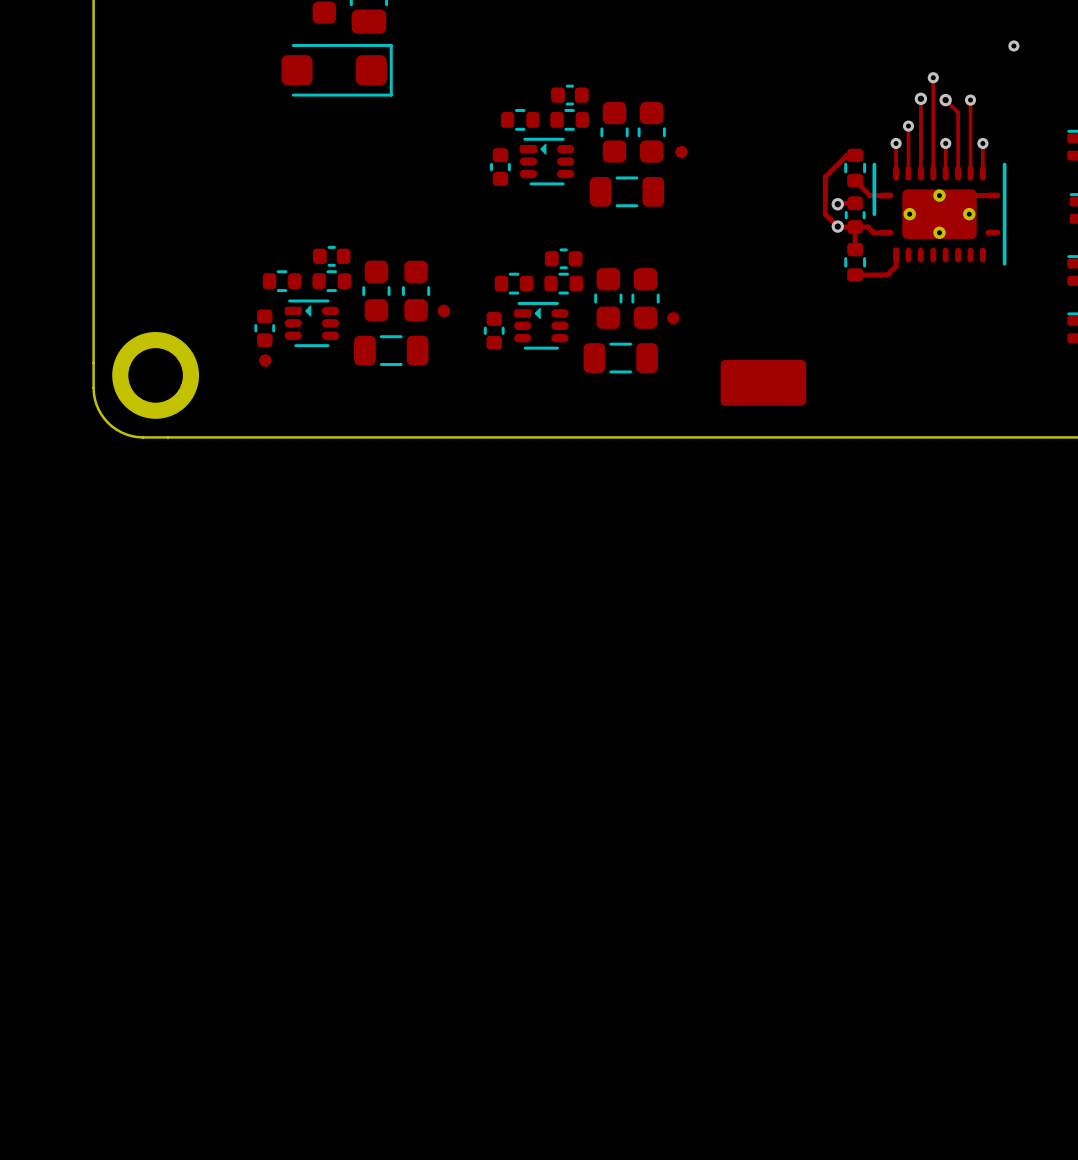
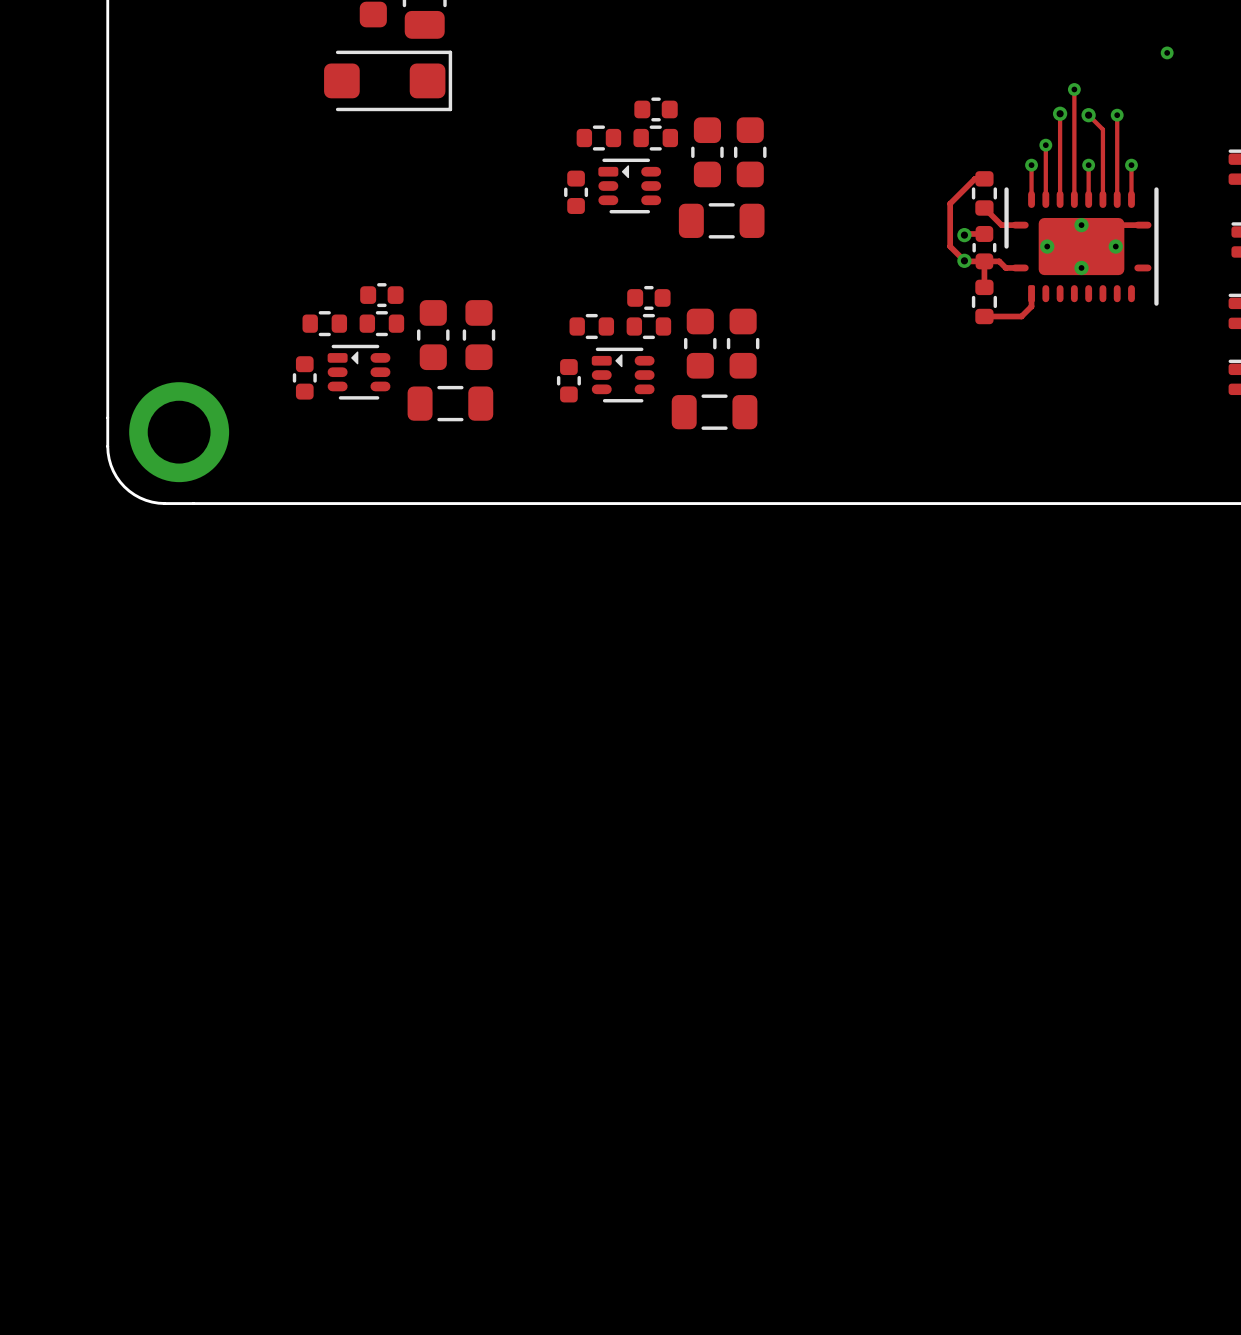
part: (681, 152) -> none
part: (443, 310) -> none
part: (673, 318) -> none
part: (265, 360) -> none
part: (763, 382) -> none

